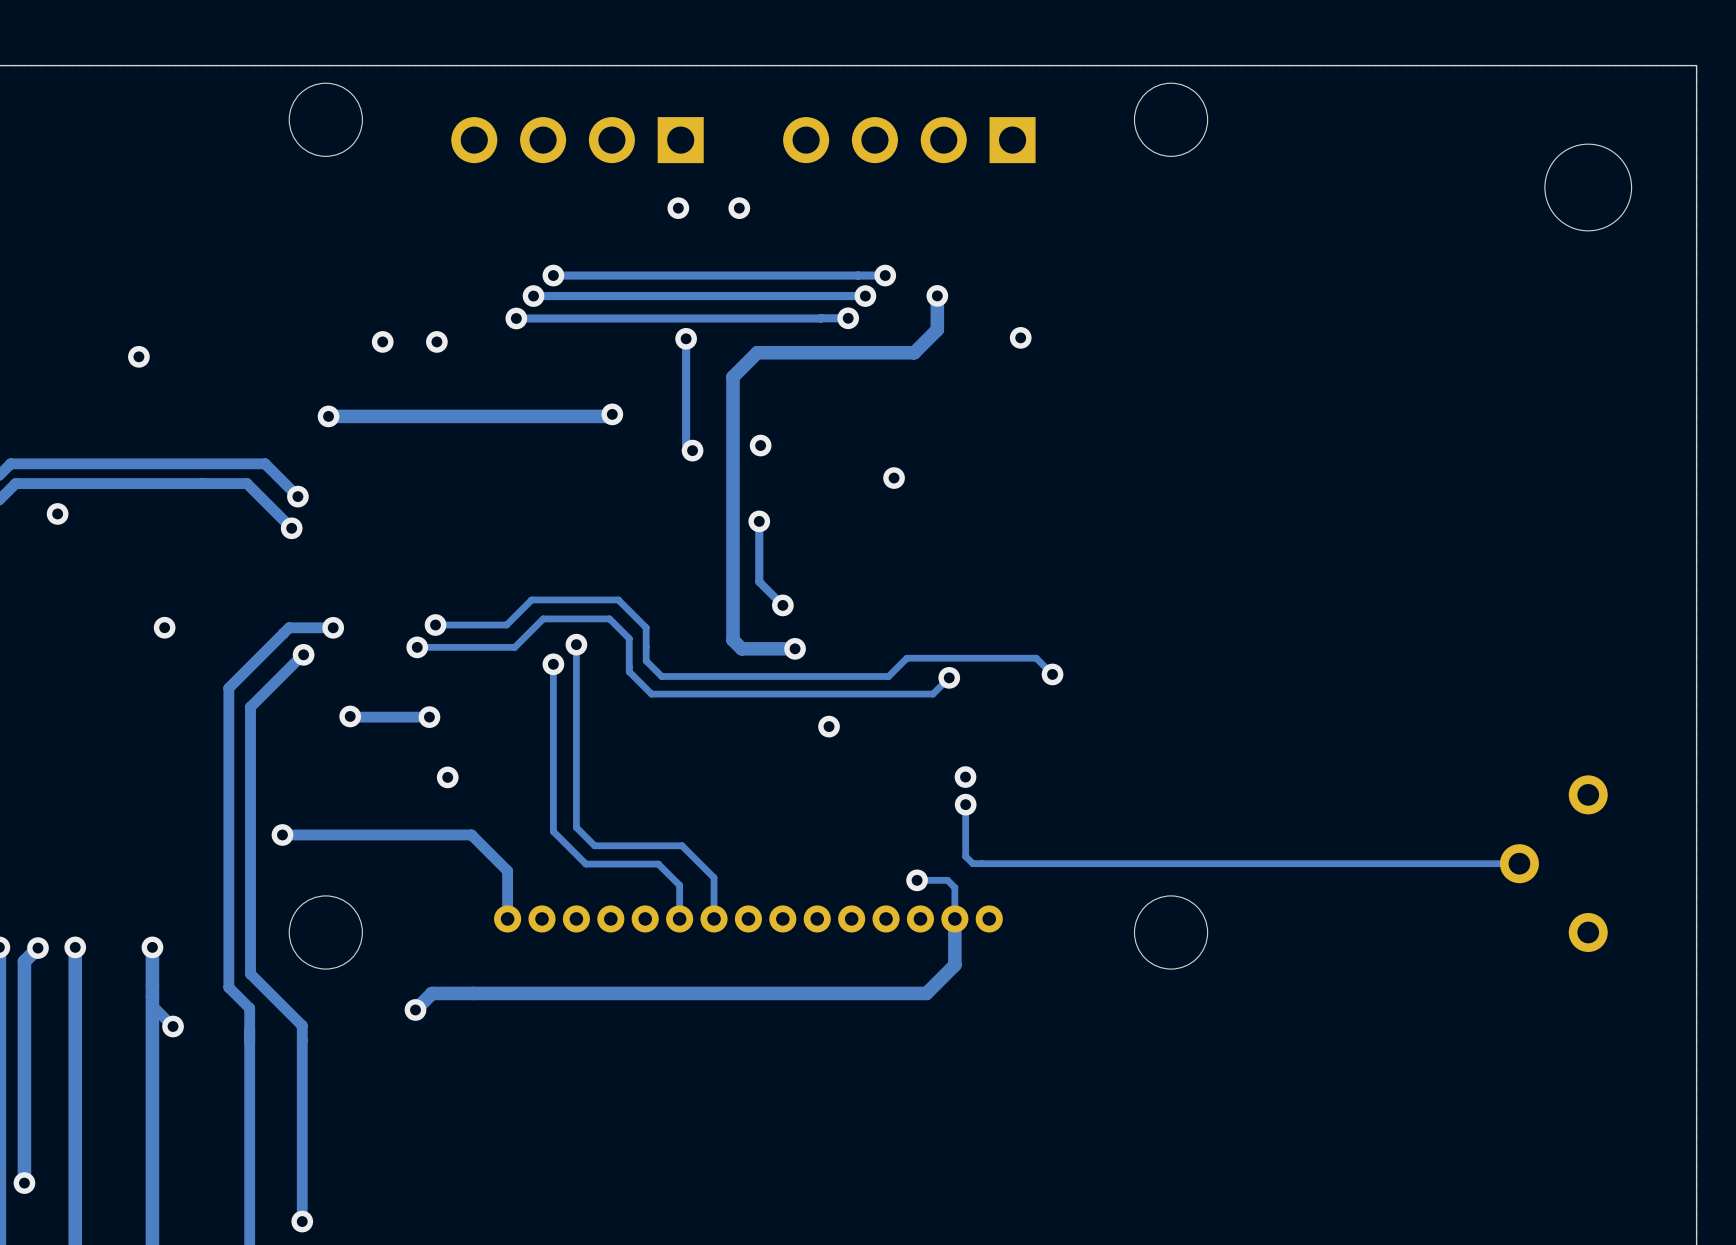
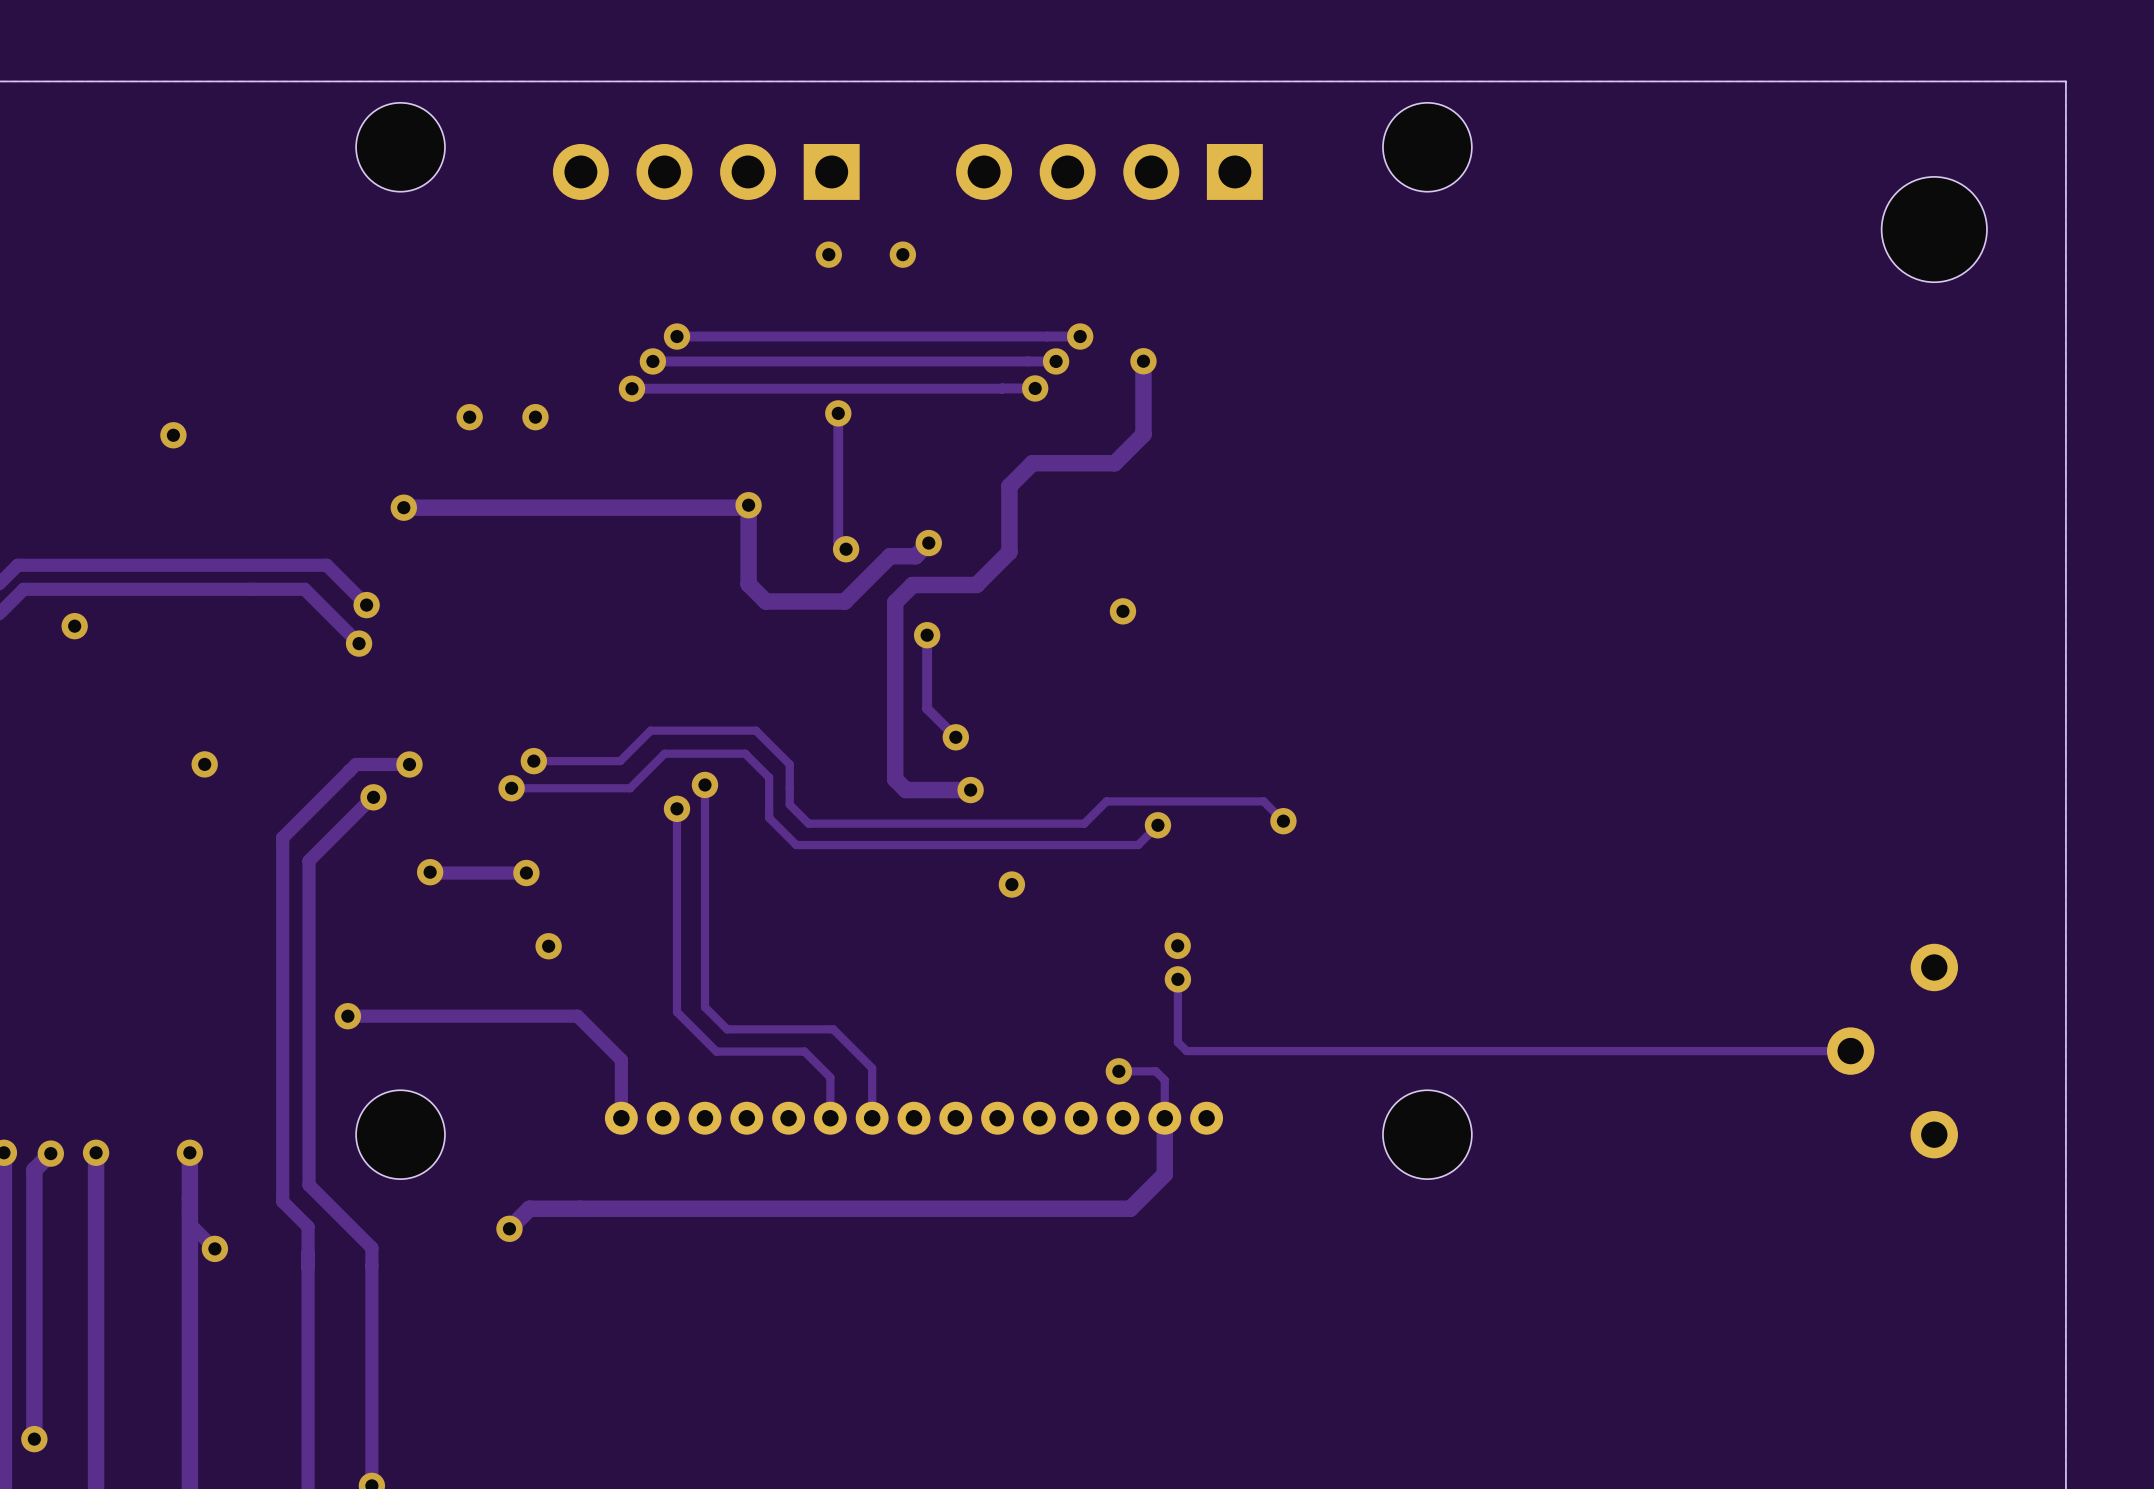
track: (937, 329) (914, 352) (757, 352) (732, 377) (732, 494) -> (1143, 402) (1143, 434) (1114, 463) (1032, 463) (1009, 486) (1009, 552) (976, 585) (912, 585) (895, 602)
via: (1020, 337) -> none
track: none -> (748, 505) (748, 584) (765, 601) (844, 601) (890, 556) (915, 556) (928, 543)
via position: (894, 478) -> (1122, 611)

